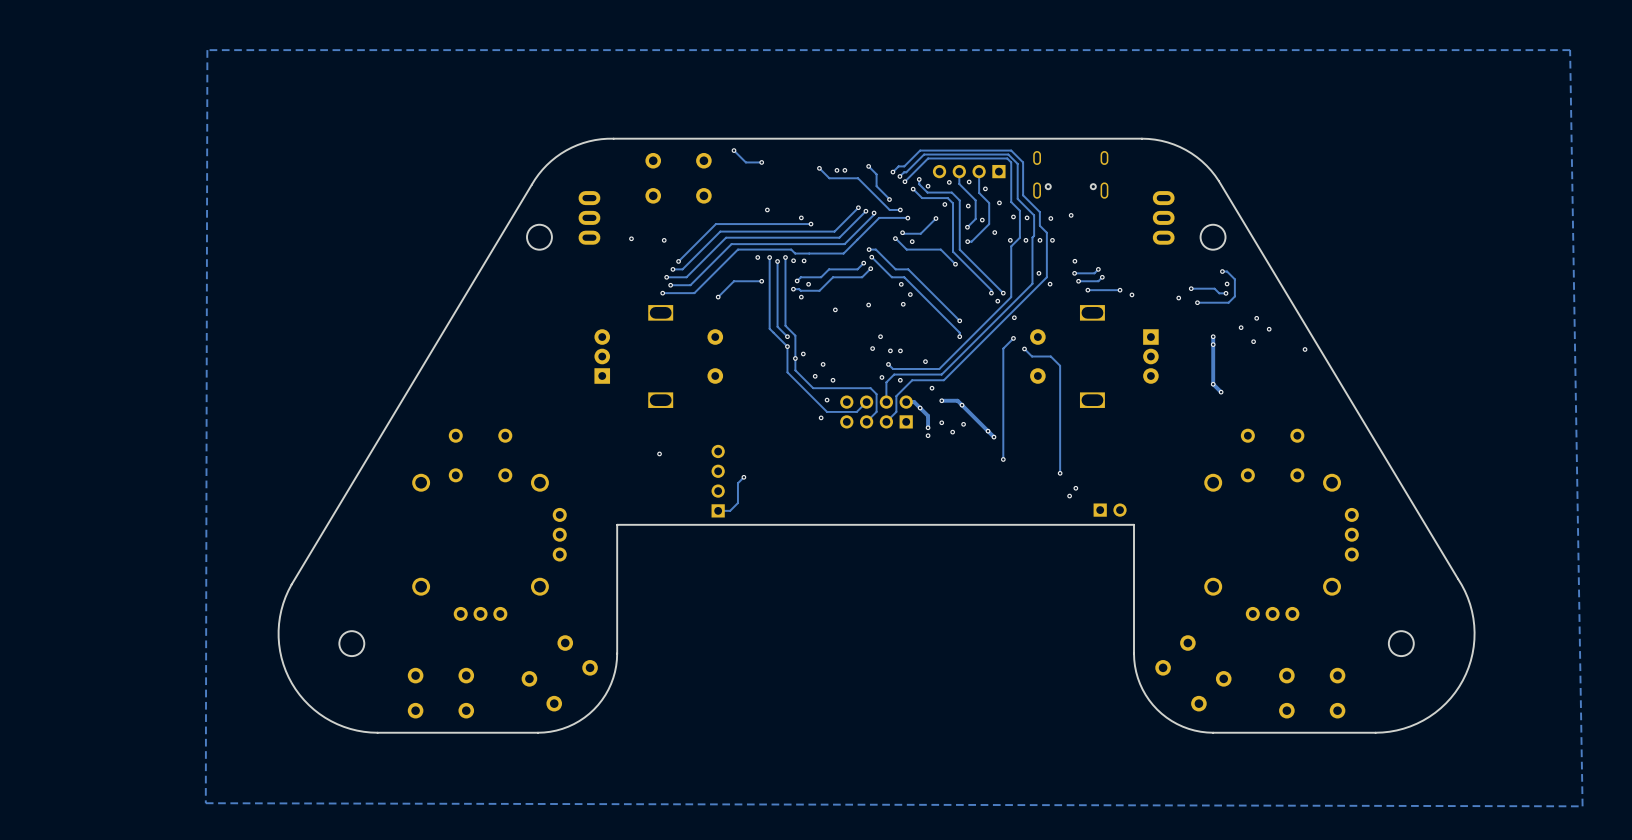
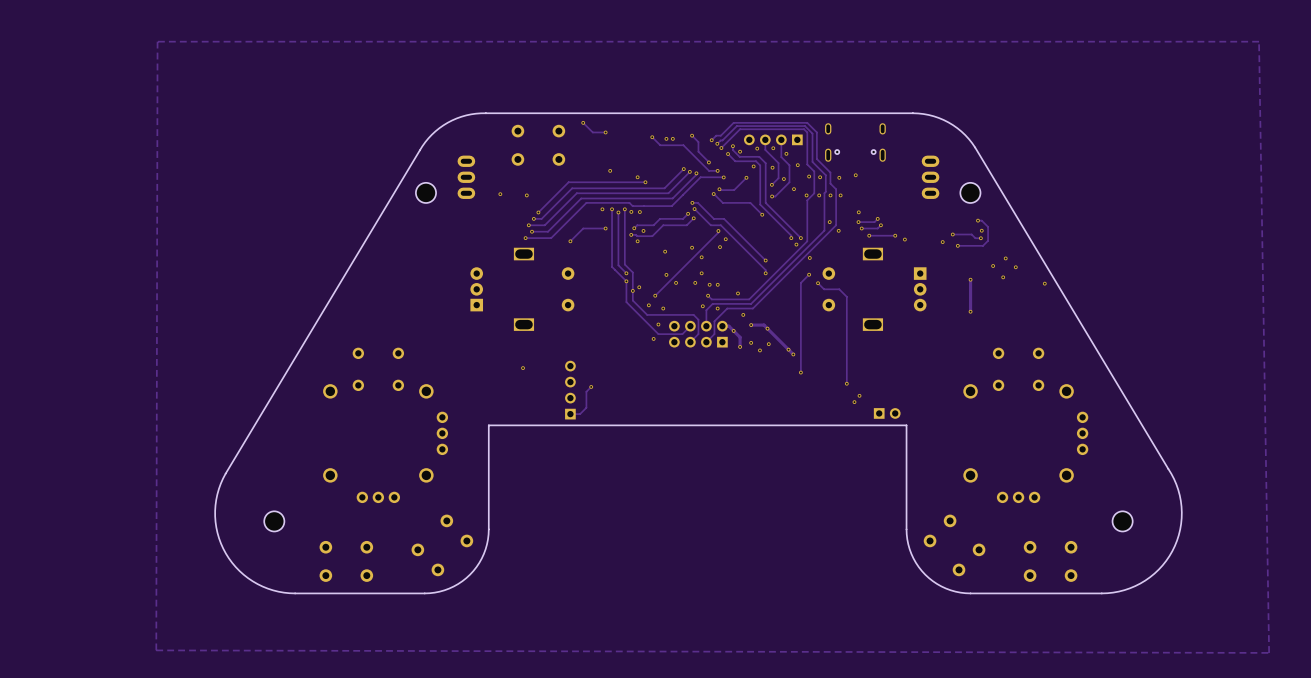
via: (912, 241) -> none
track: none -> (718, 231) (655, 295)
via: none -> (701, 257)
track: (1213, 336) (1213, 344) -> none
via: (1213, 336) -> none
via: none -> (666, 274)
via: none -> (676, 282)
track: (1213, 384) (1221, 392) -> none
via: (1221, 392) -> none
via: (928, 435) -> none

